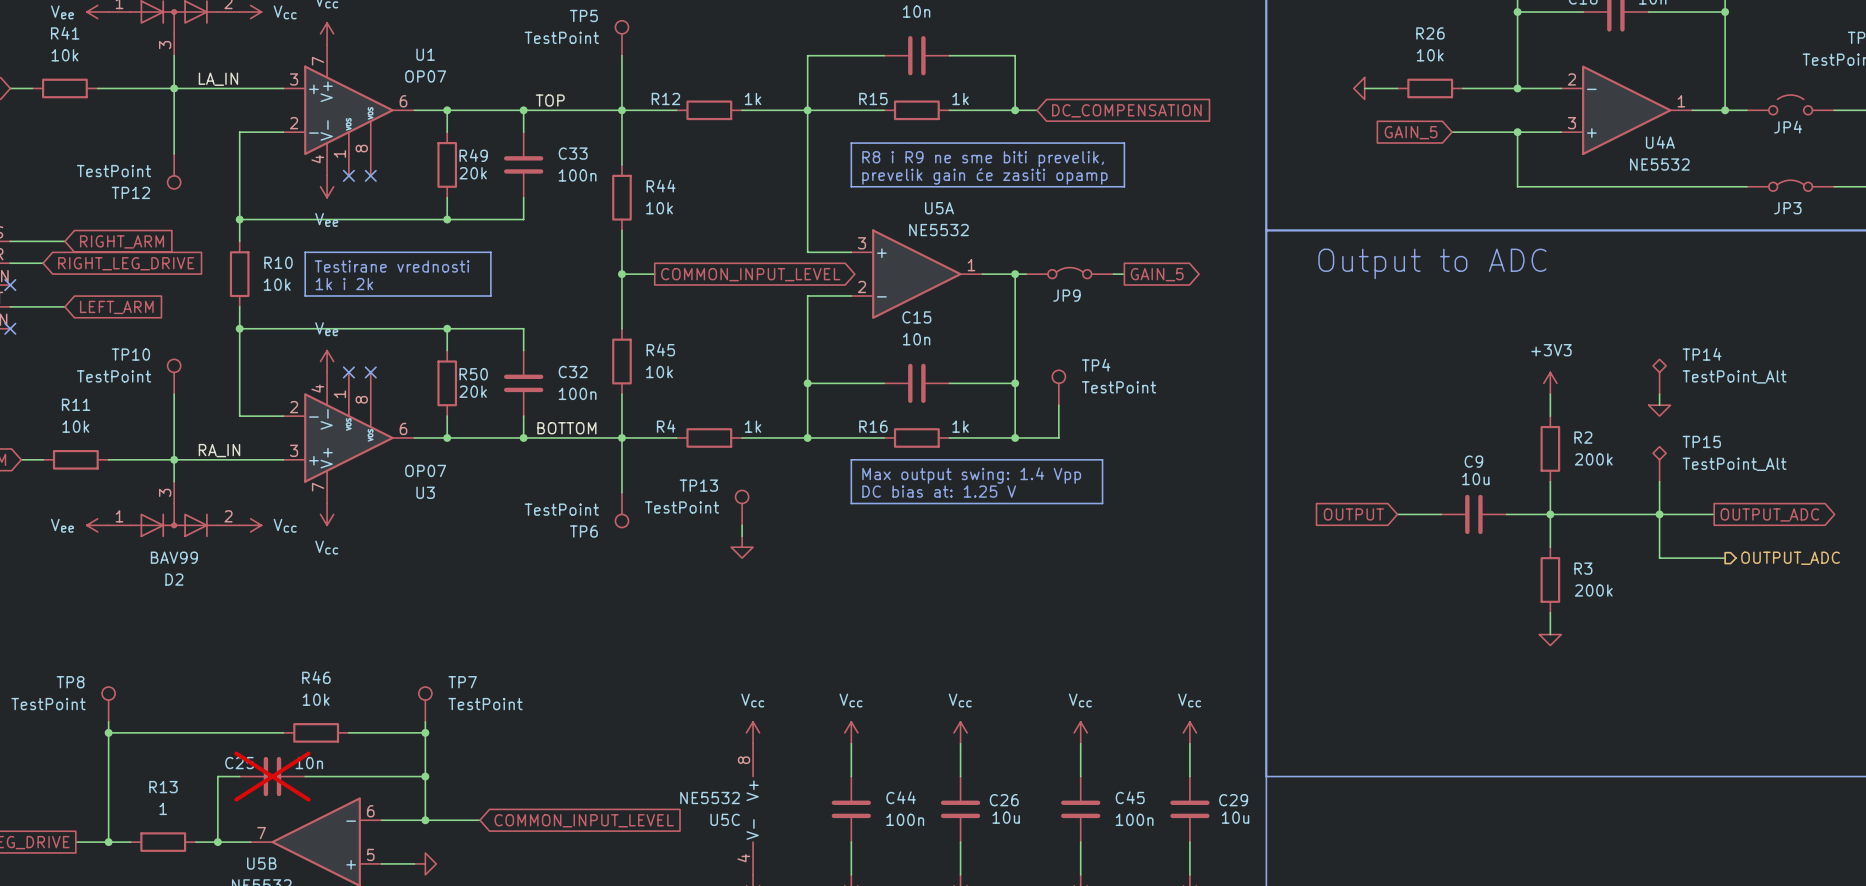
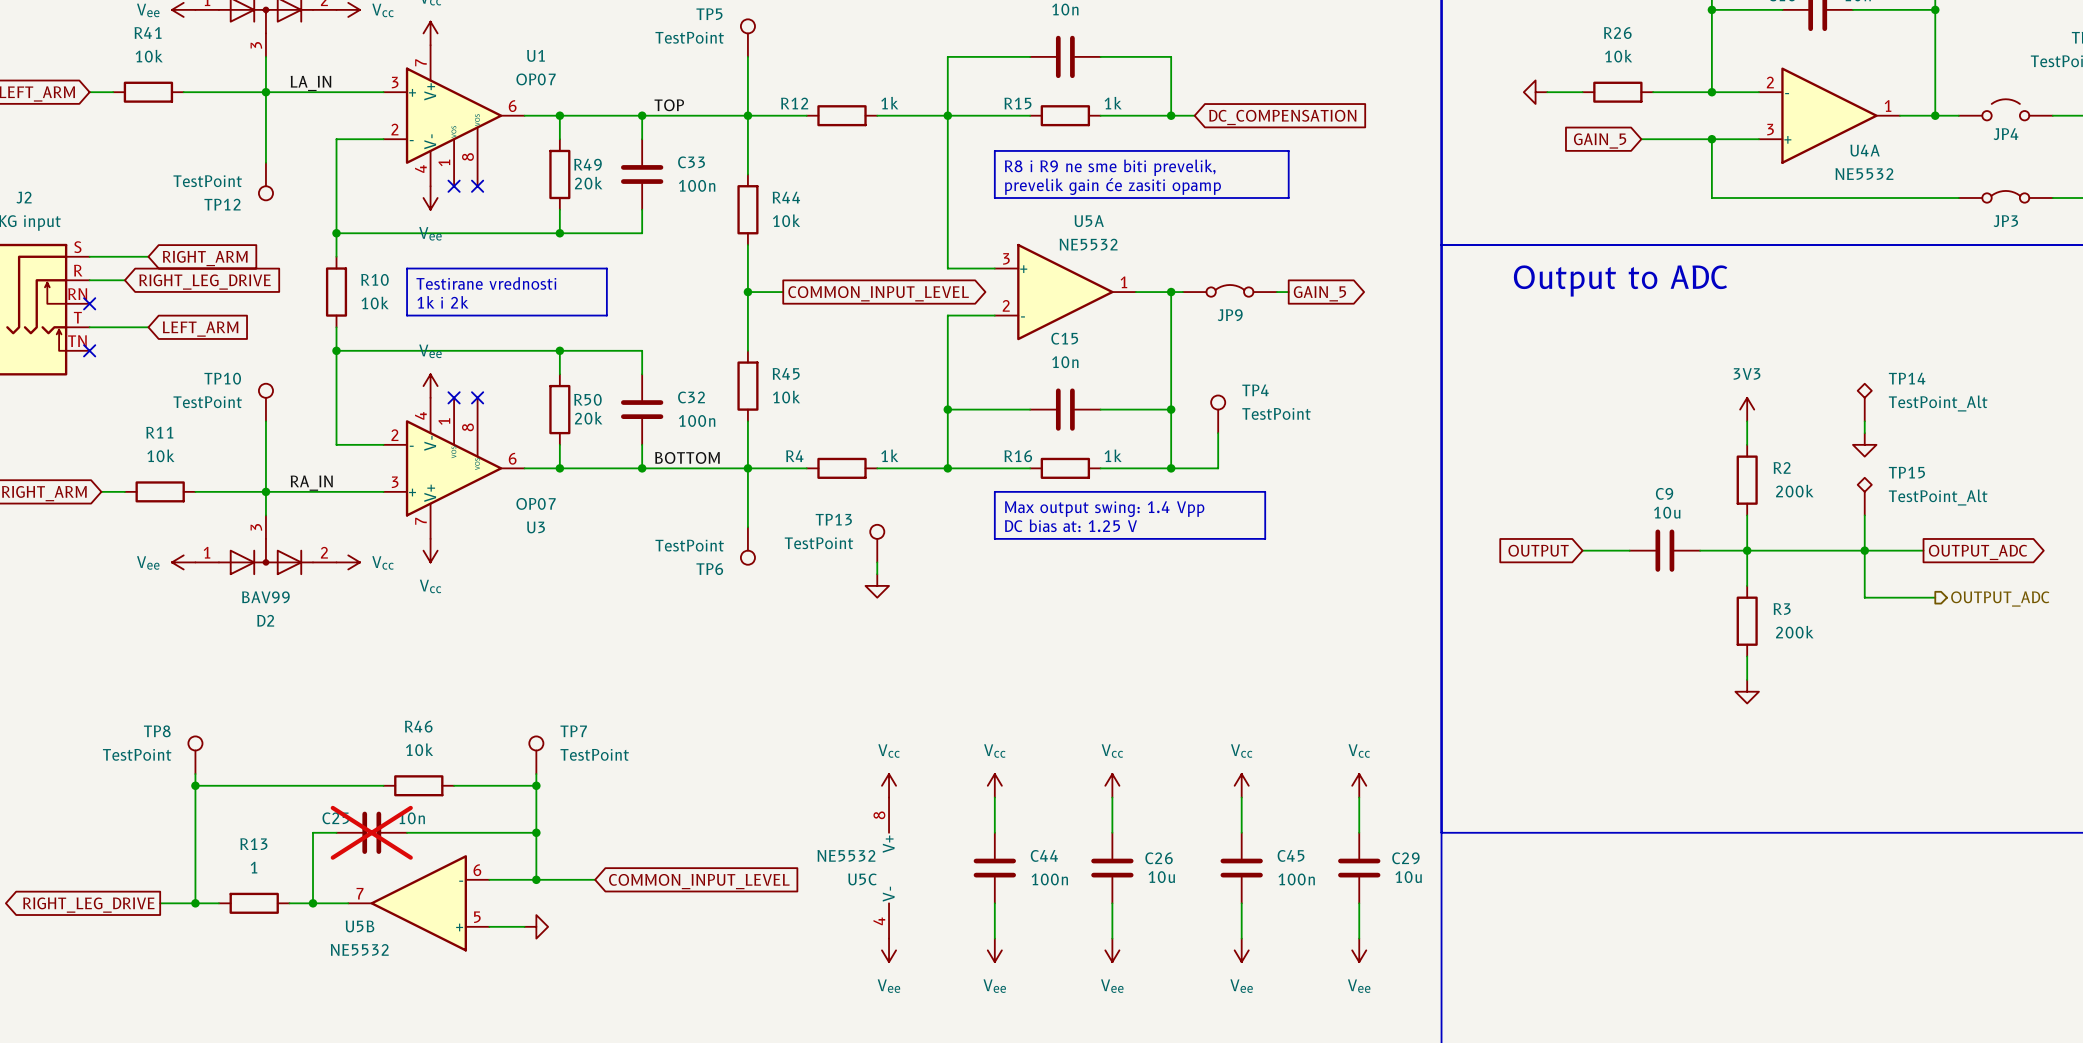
power symbol shape: [1353, 77, 1365, 100] -> [1523, 80, 1548, 104]
power symbol: +3V3 (1550, 383) -> 3V3 (1747, 409)
power symbol shape: [1648, 405, 1671, 417] -> [1852, 433, 1877, 457]
power symbol shape: [1539, 634, 1562, 646] -> [1735, 679, 1759, 704]

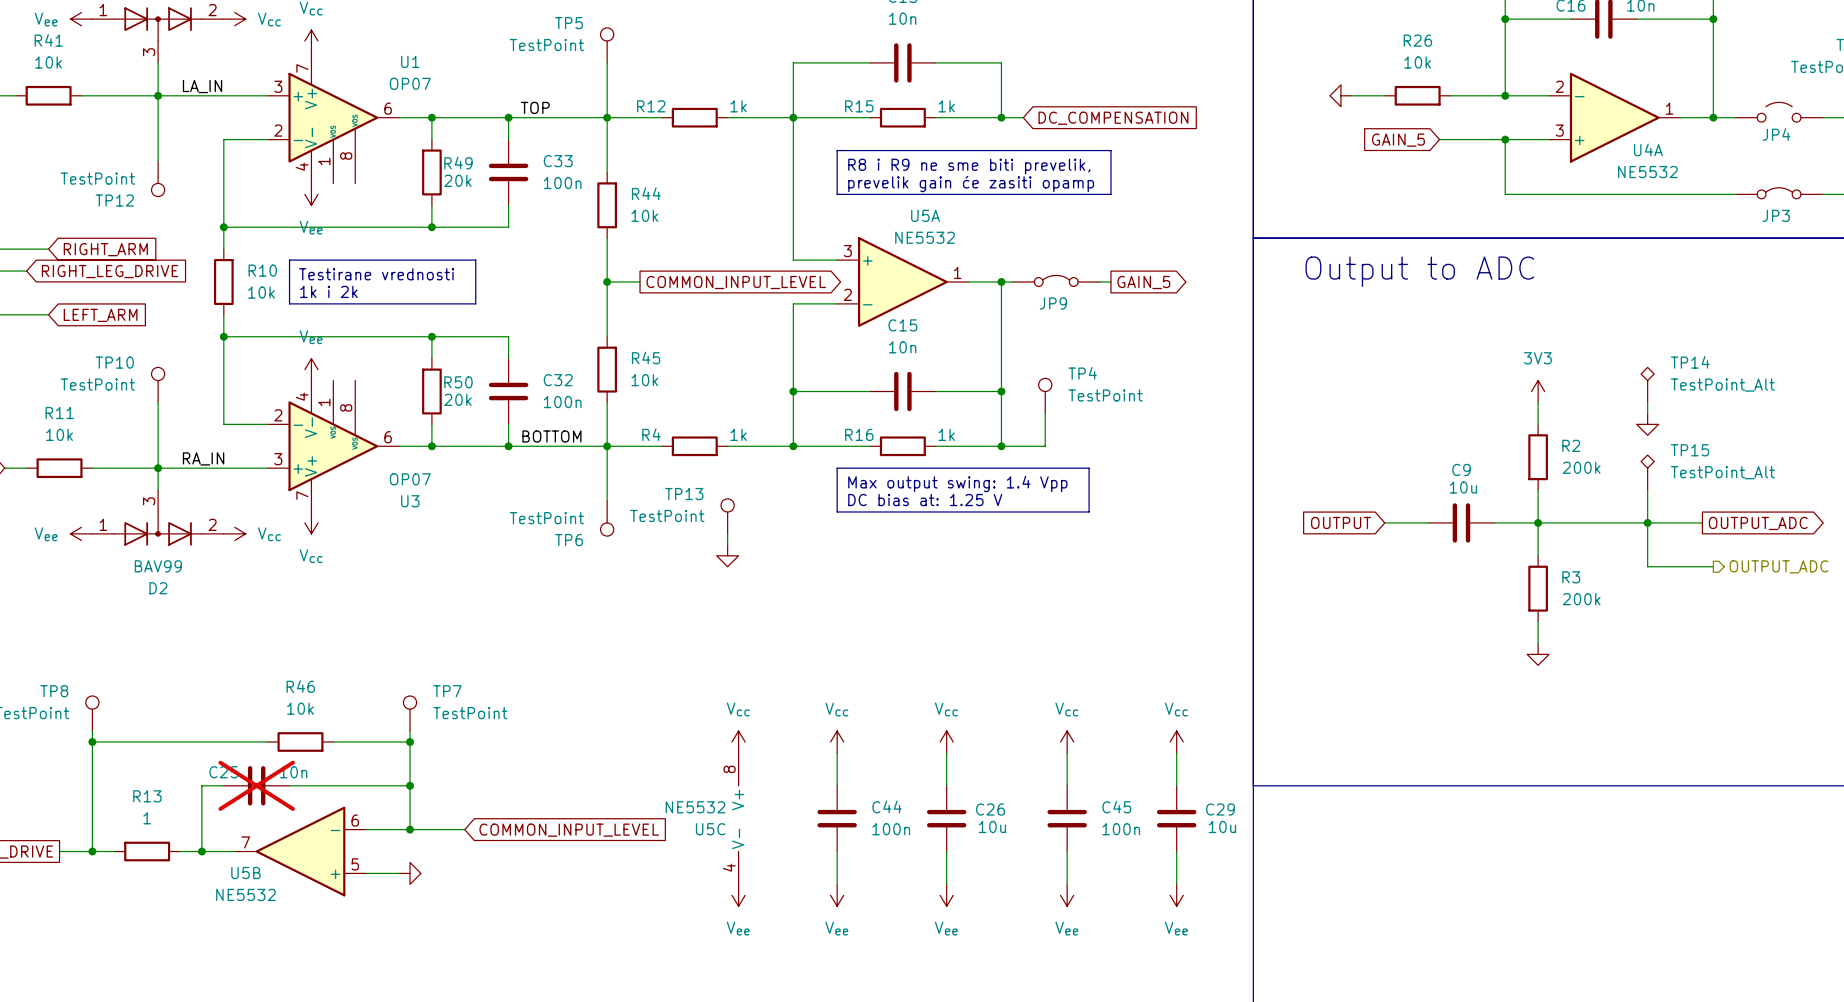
no-connect mark: (454, 186) -> none
no-connect mark: (477, 186) -> none
no-connect mark: (454, 397) -> none
no-connect mark: (477, 397) -> none

